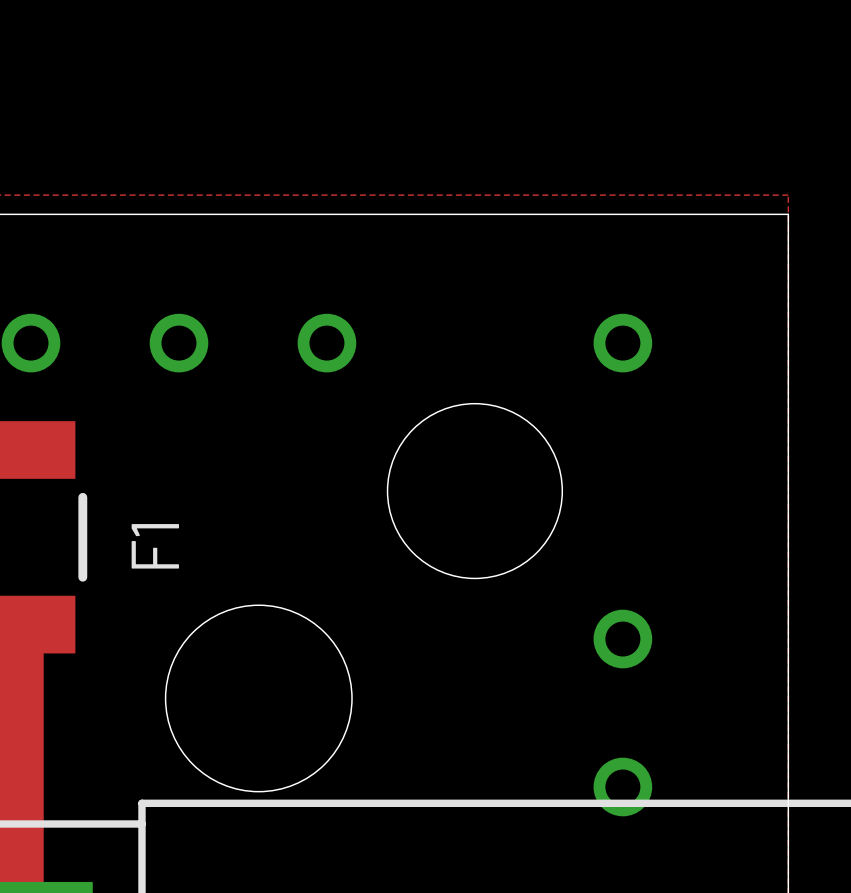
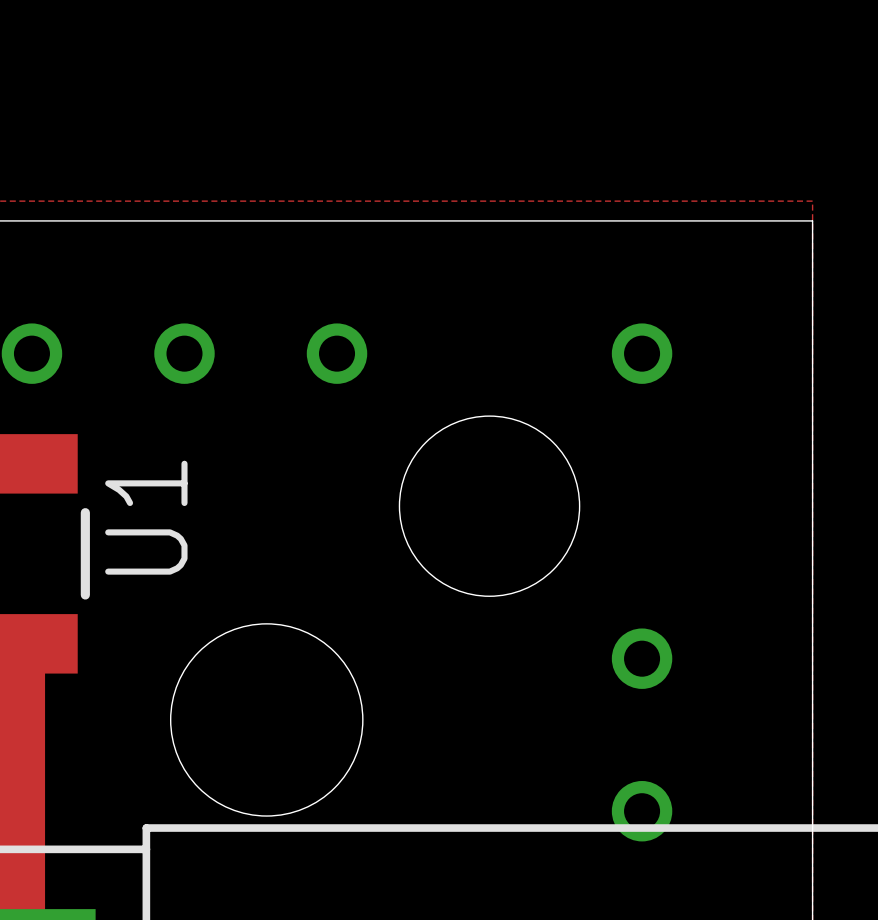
F1 name: F1 (155, 546) -> U1 (146, 517)

